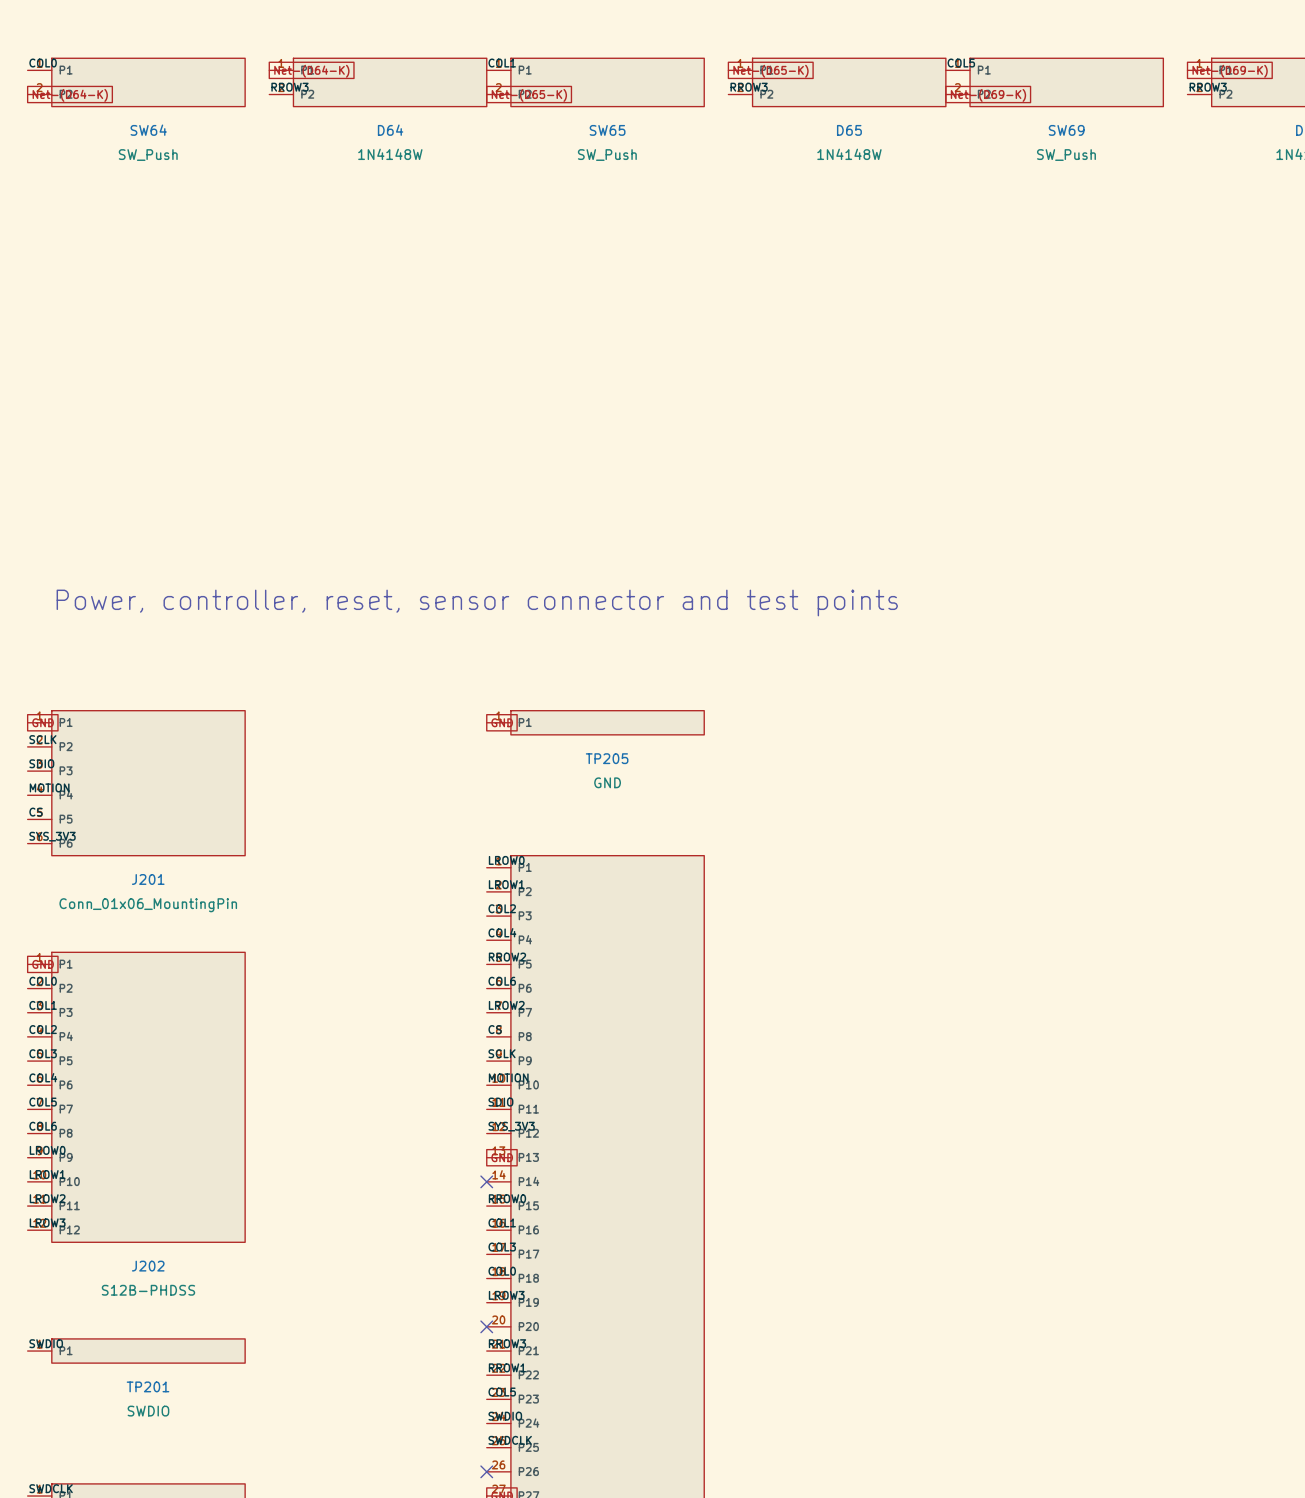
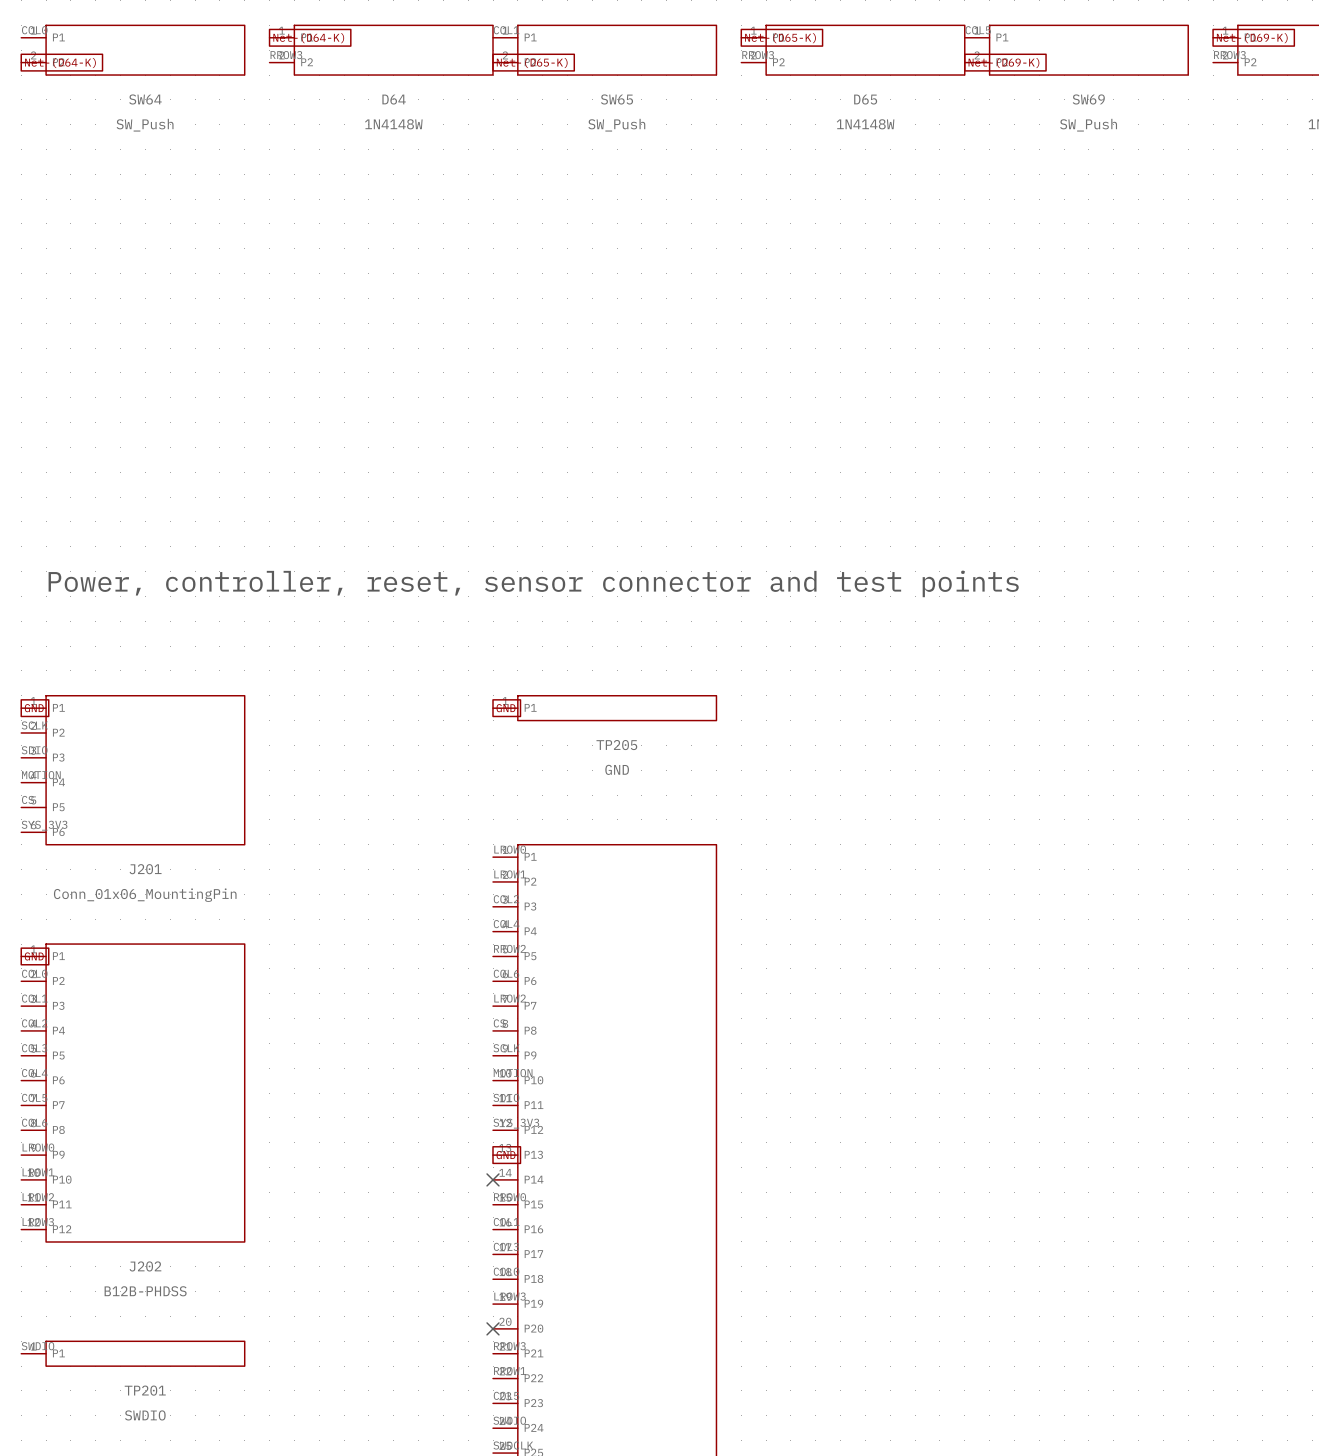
J202 value: S12B-PHDSS (148, 1290) -> B12B-PHDSS (145, 1291)

